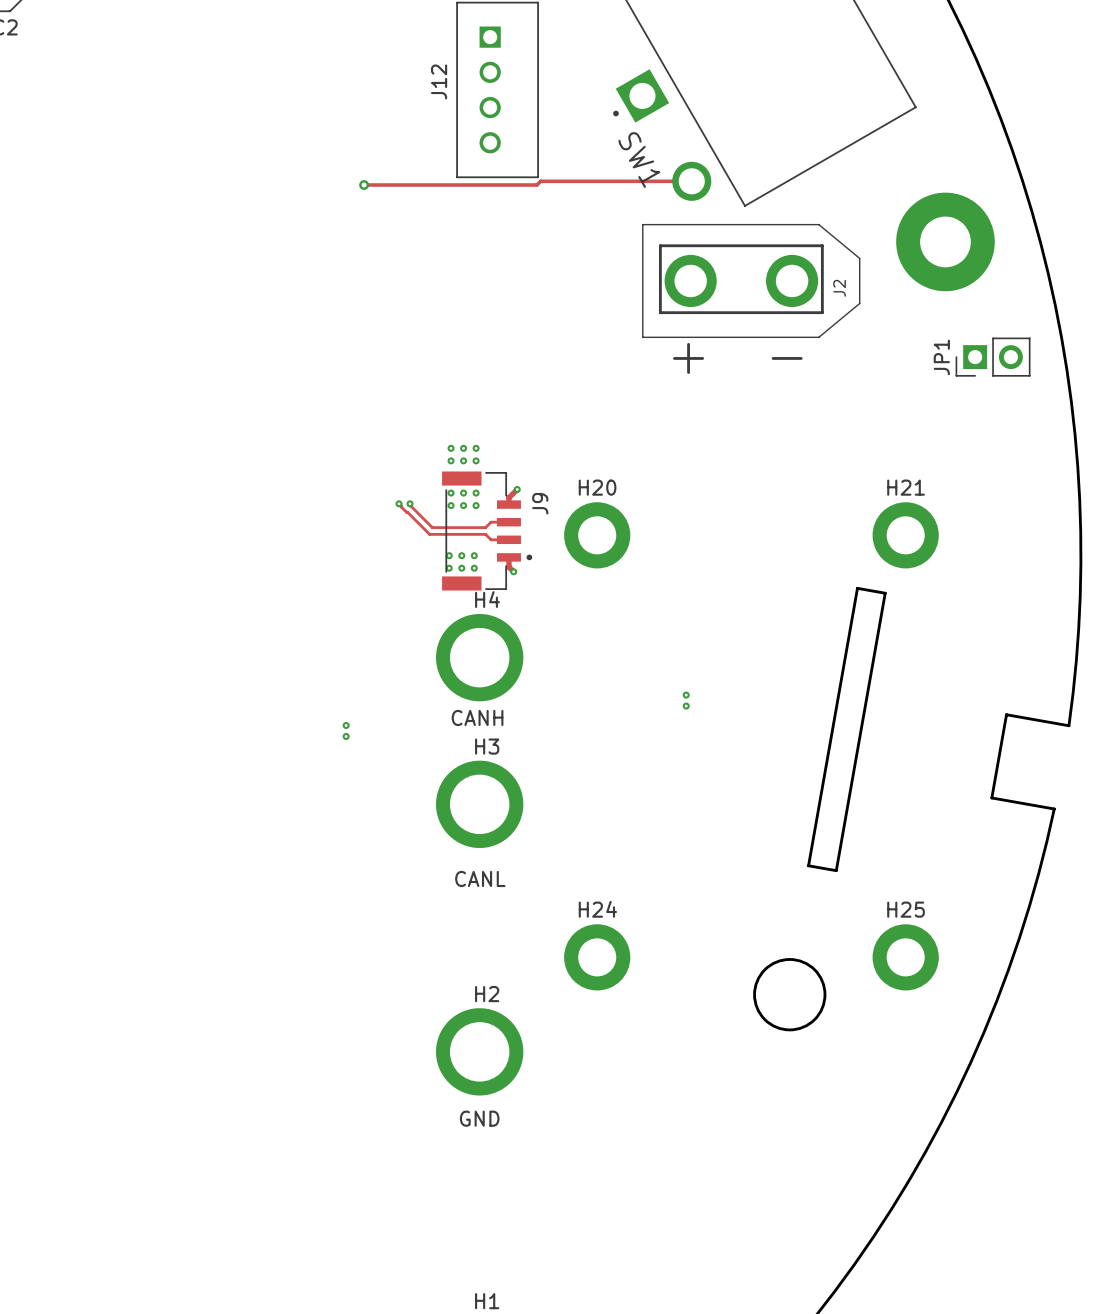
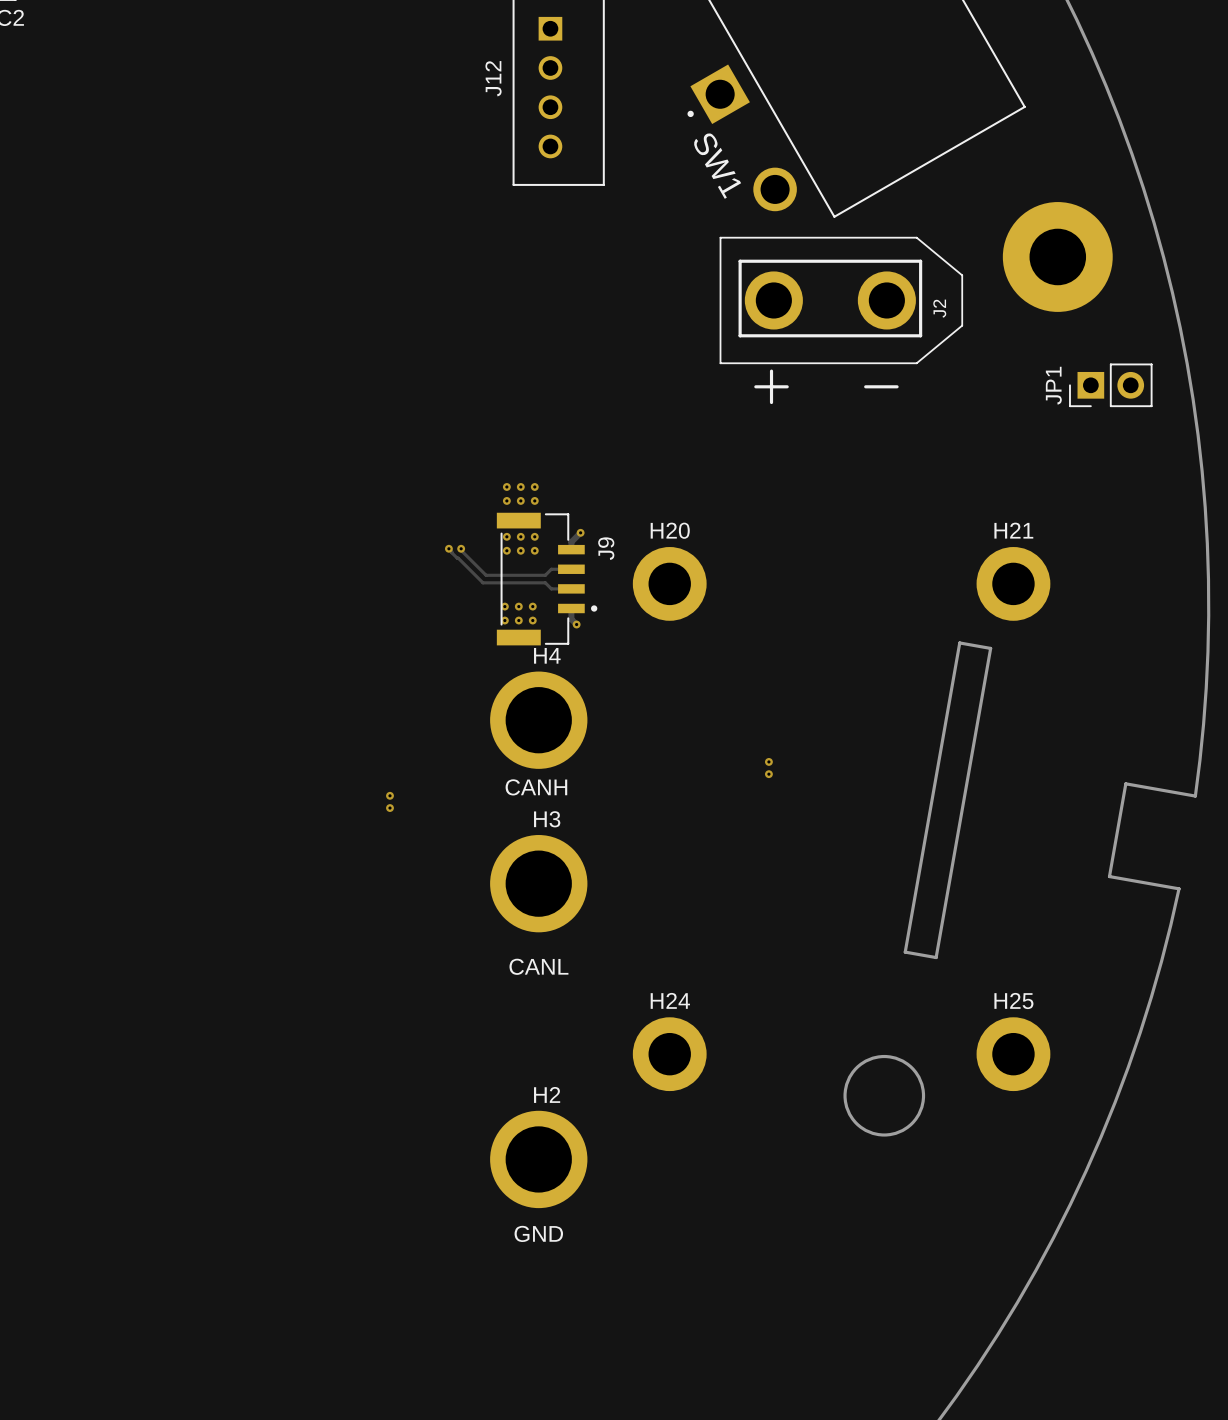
track: (691, 181) (540, 181) (536, 185) (364, 185) -> none
via: (364, 185) -> none

